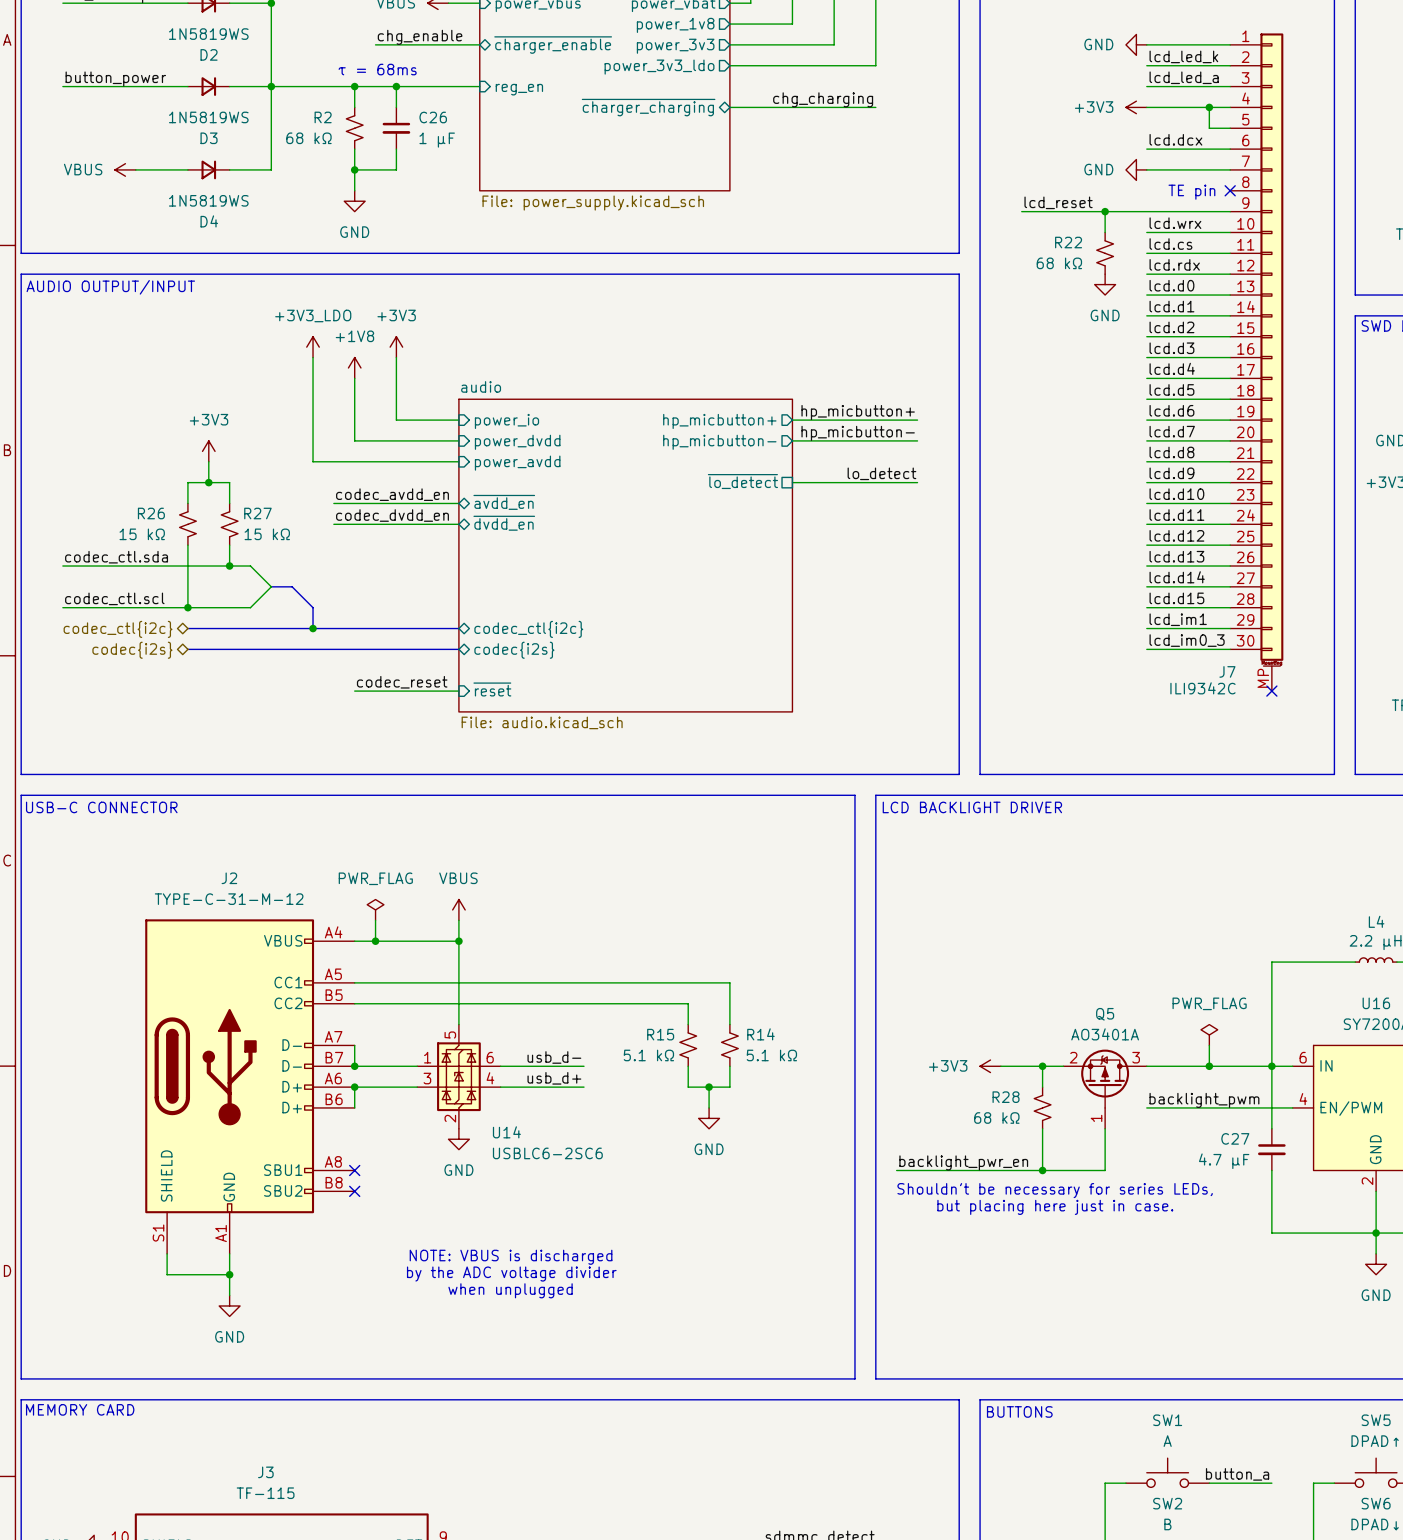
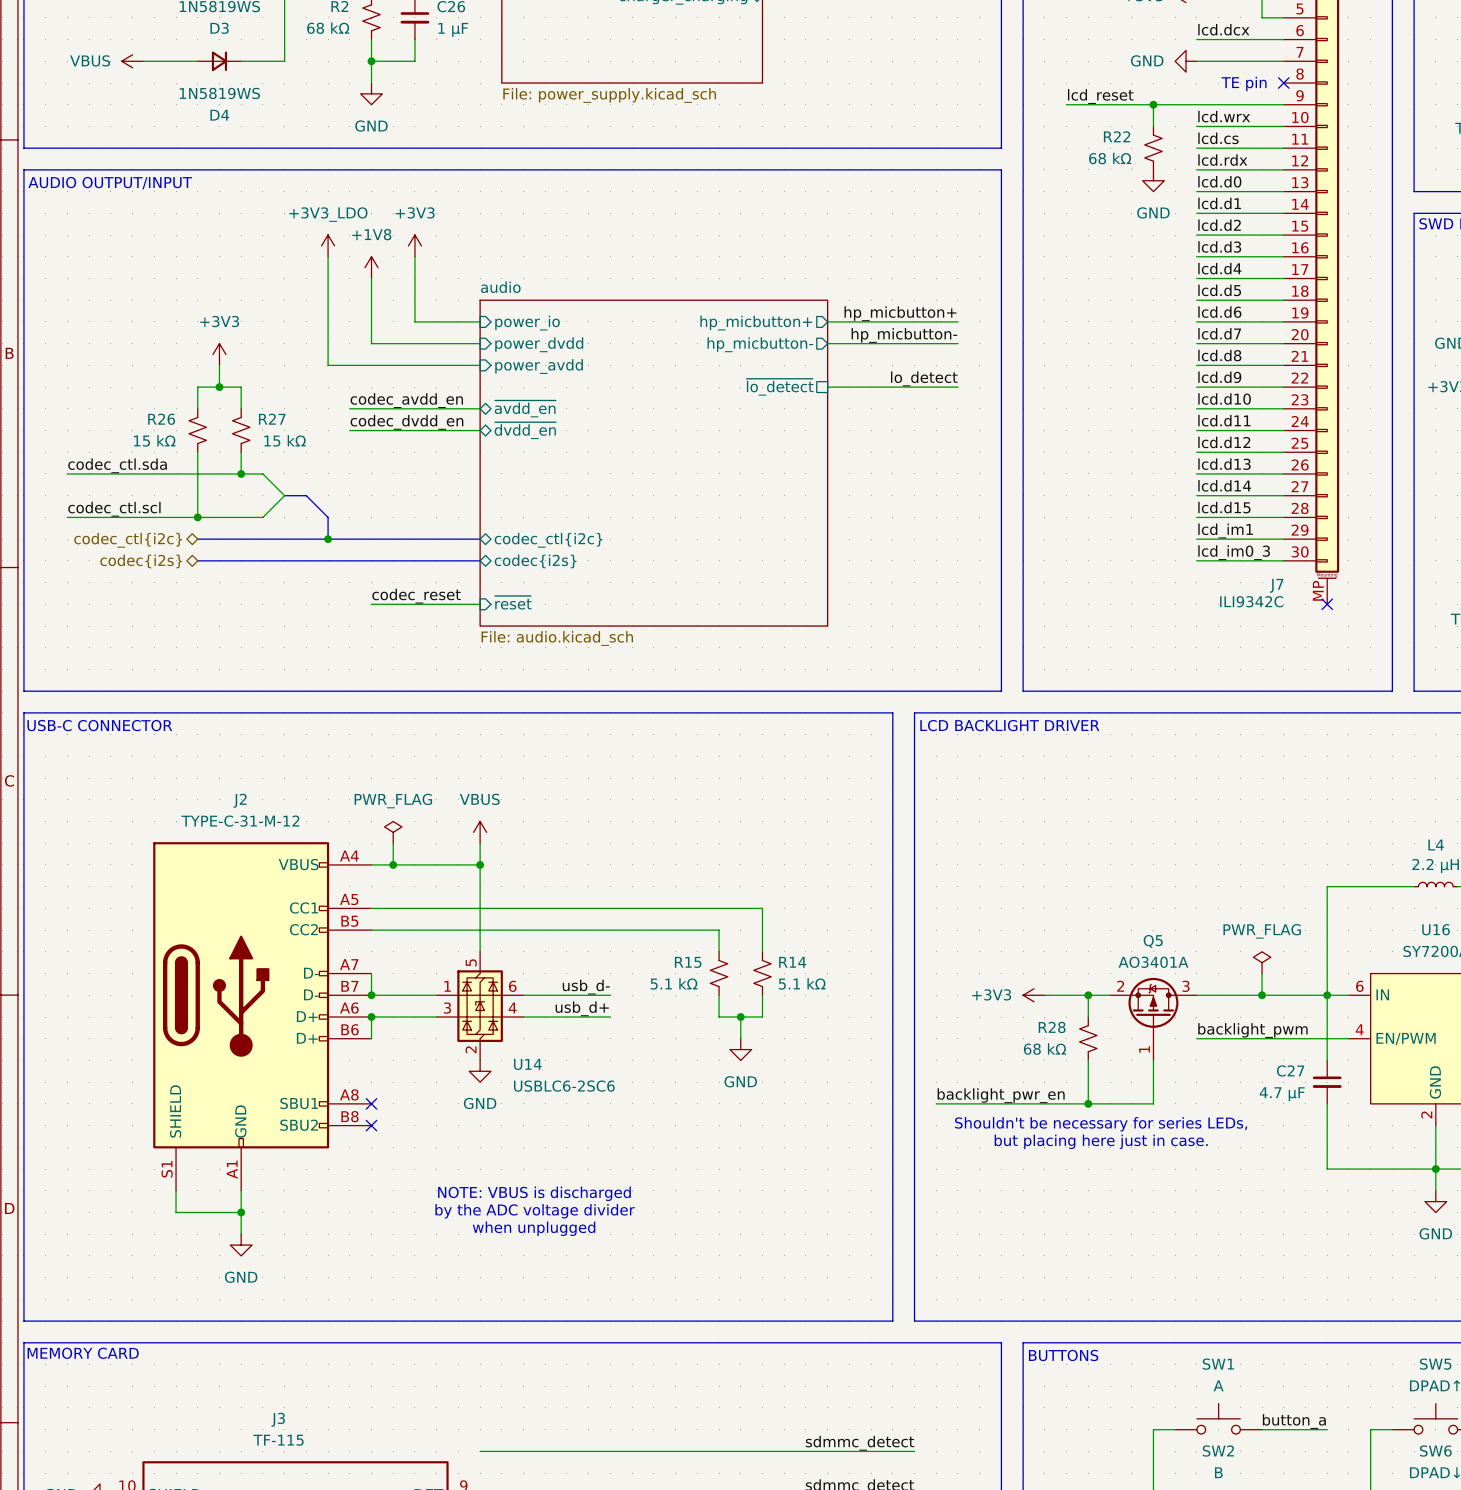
label: none -> sdmmc_detect (859, 1443)
wire: none -> (480, 1451) (914, 1451)

